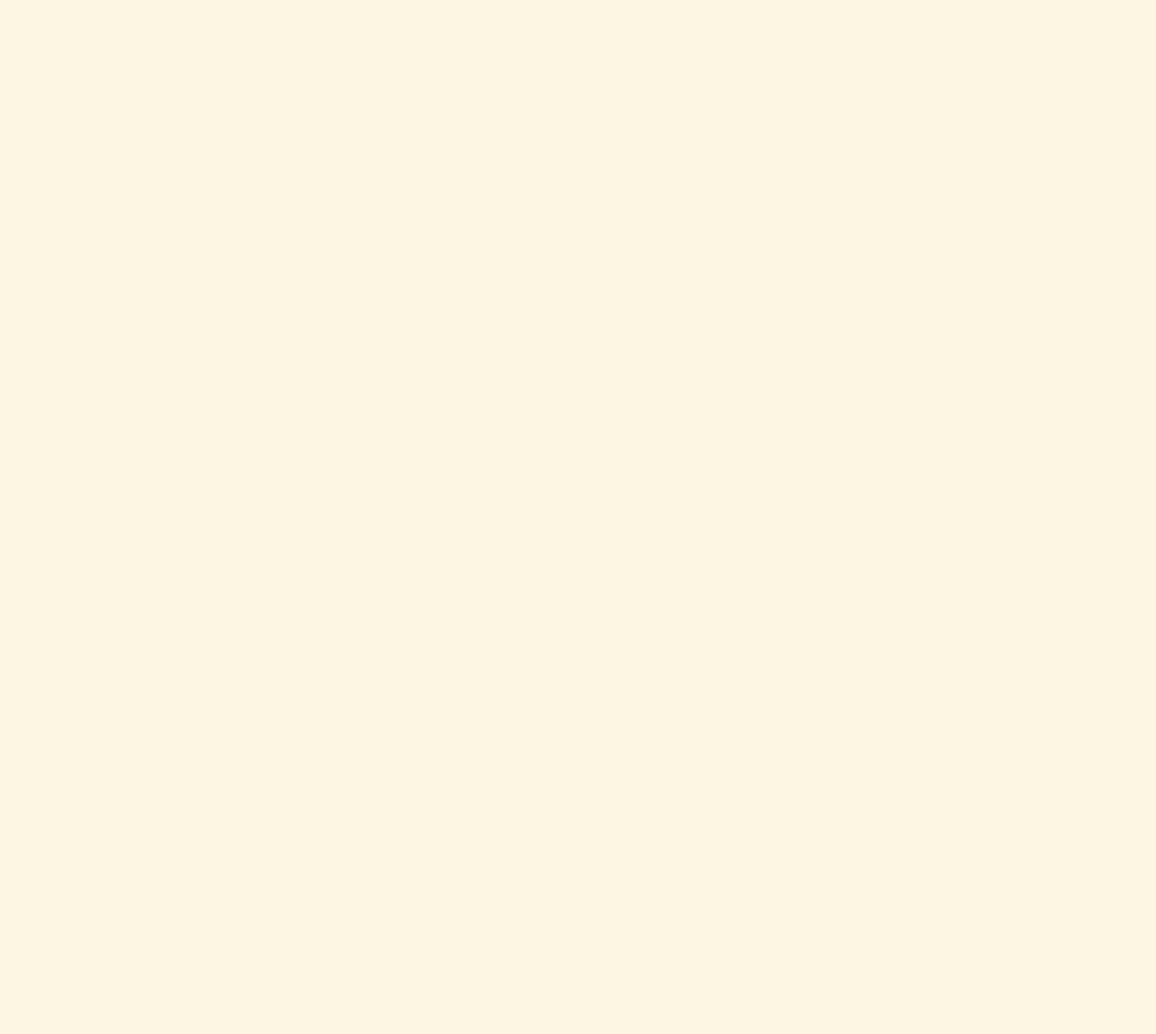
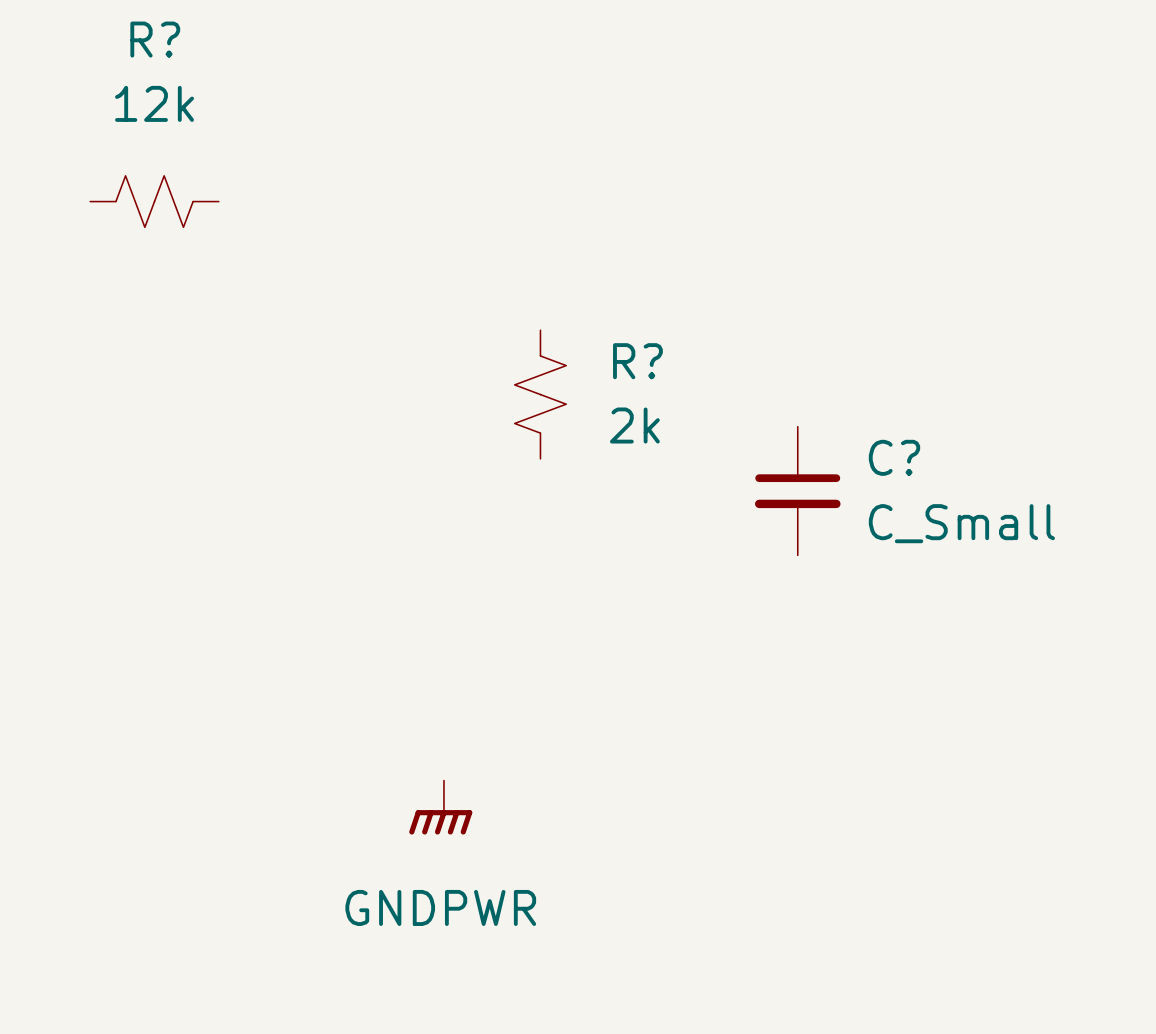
R?: none -> 12k (154, 201)
R?: none -> 2k (540, 394)
C?: none -> C_Small (797, 491)
power symbol: none -> GNDPWR (440, 807)

